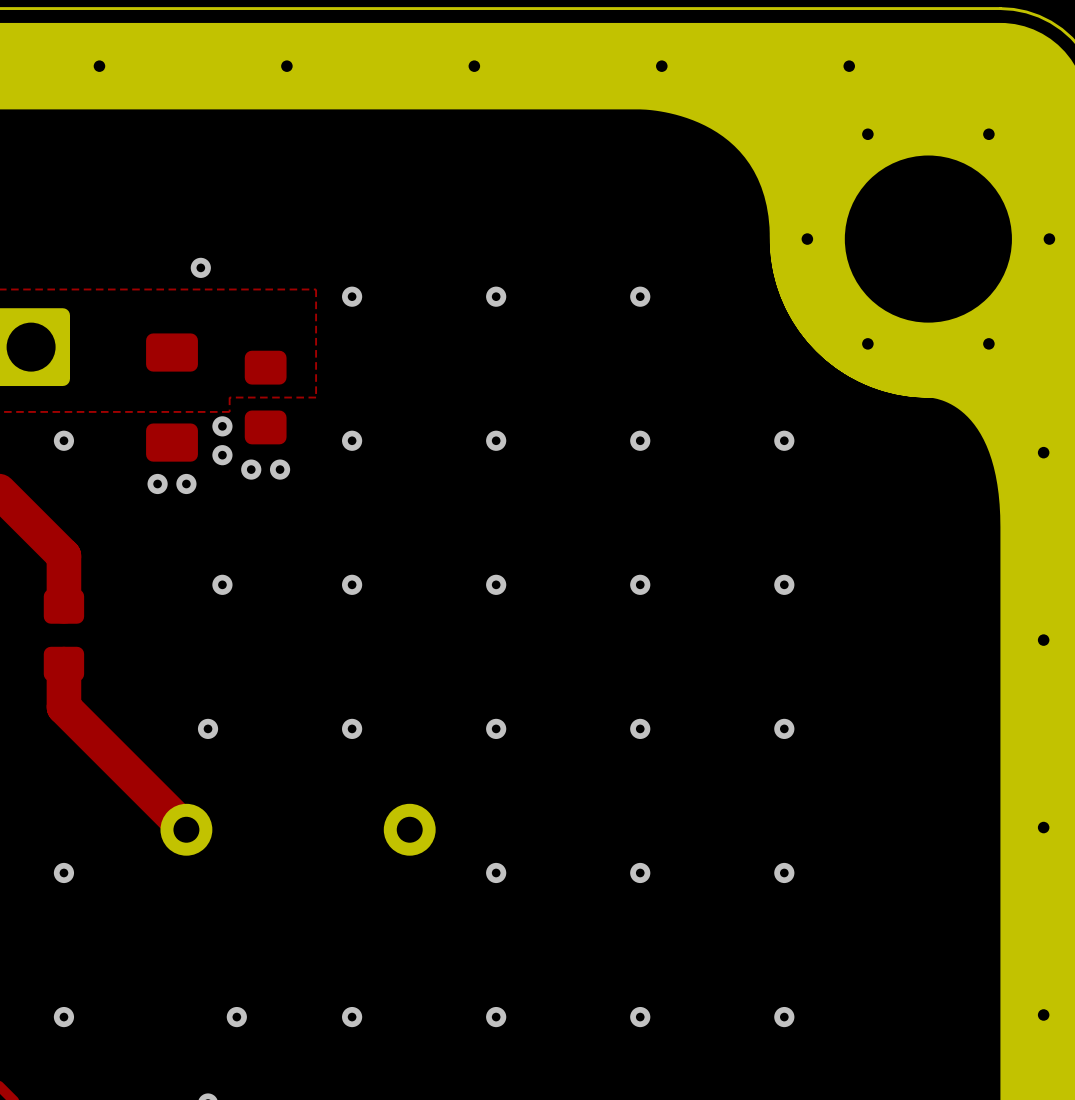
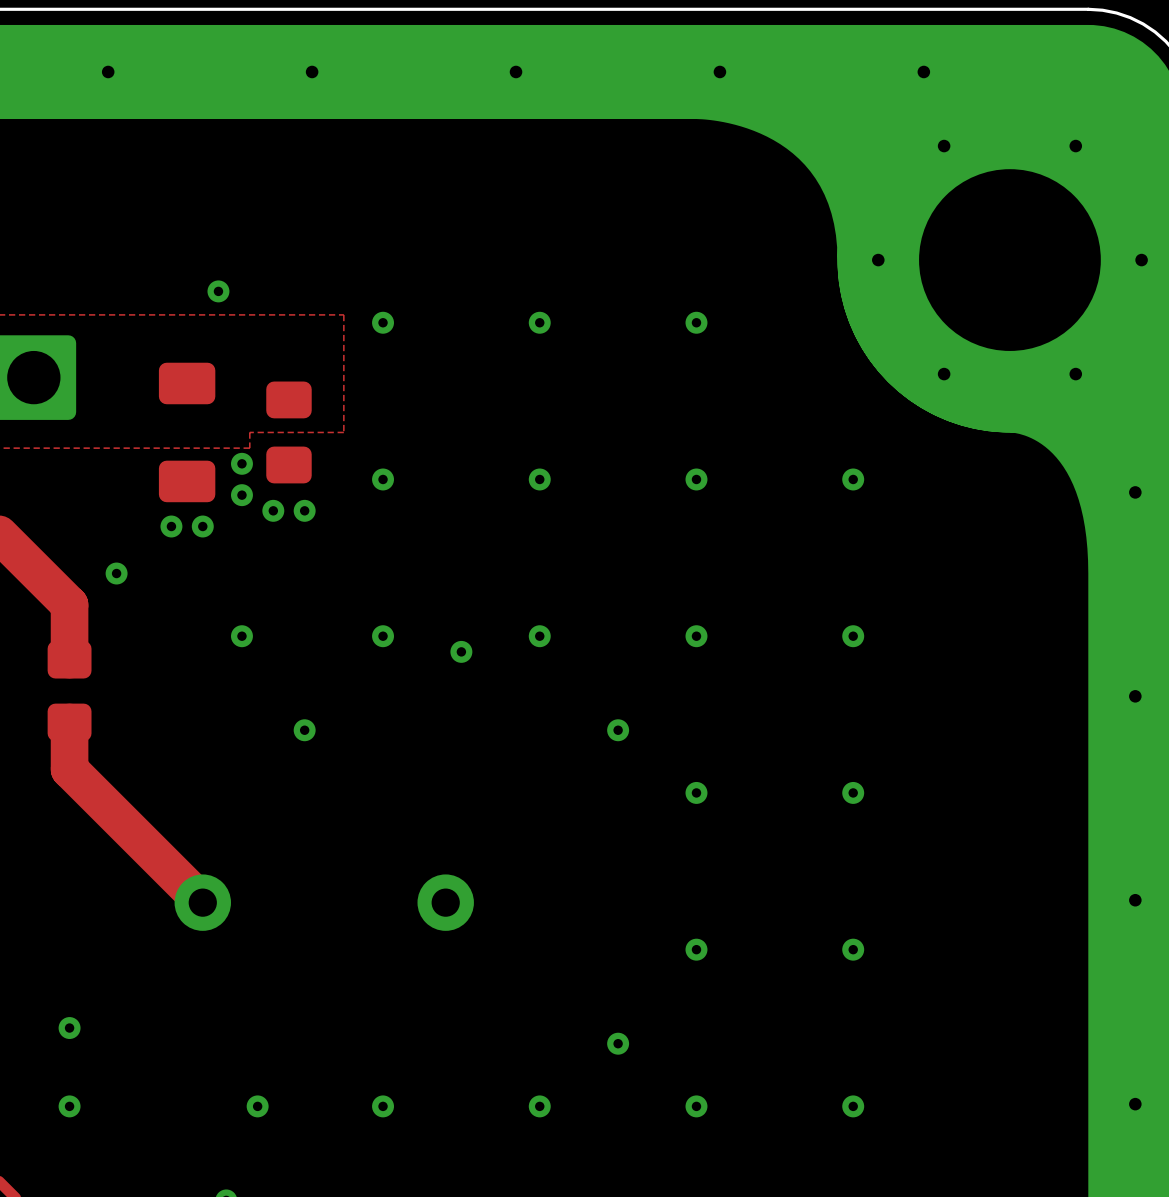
via position: (63, 440) -> (116, 573)
via: none -> (461, 651)
via: none -> (304, 730)
via: none -> (618, 730)
via: (208, 728) -> none
via: (352, 728) -> none
via: (496, 728) -> none
via position: (63, 872) -> (69, 1028)
via: (496, 872) -> none
via: none -> (618, 1043)

